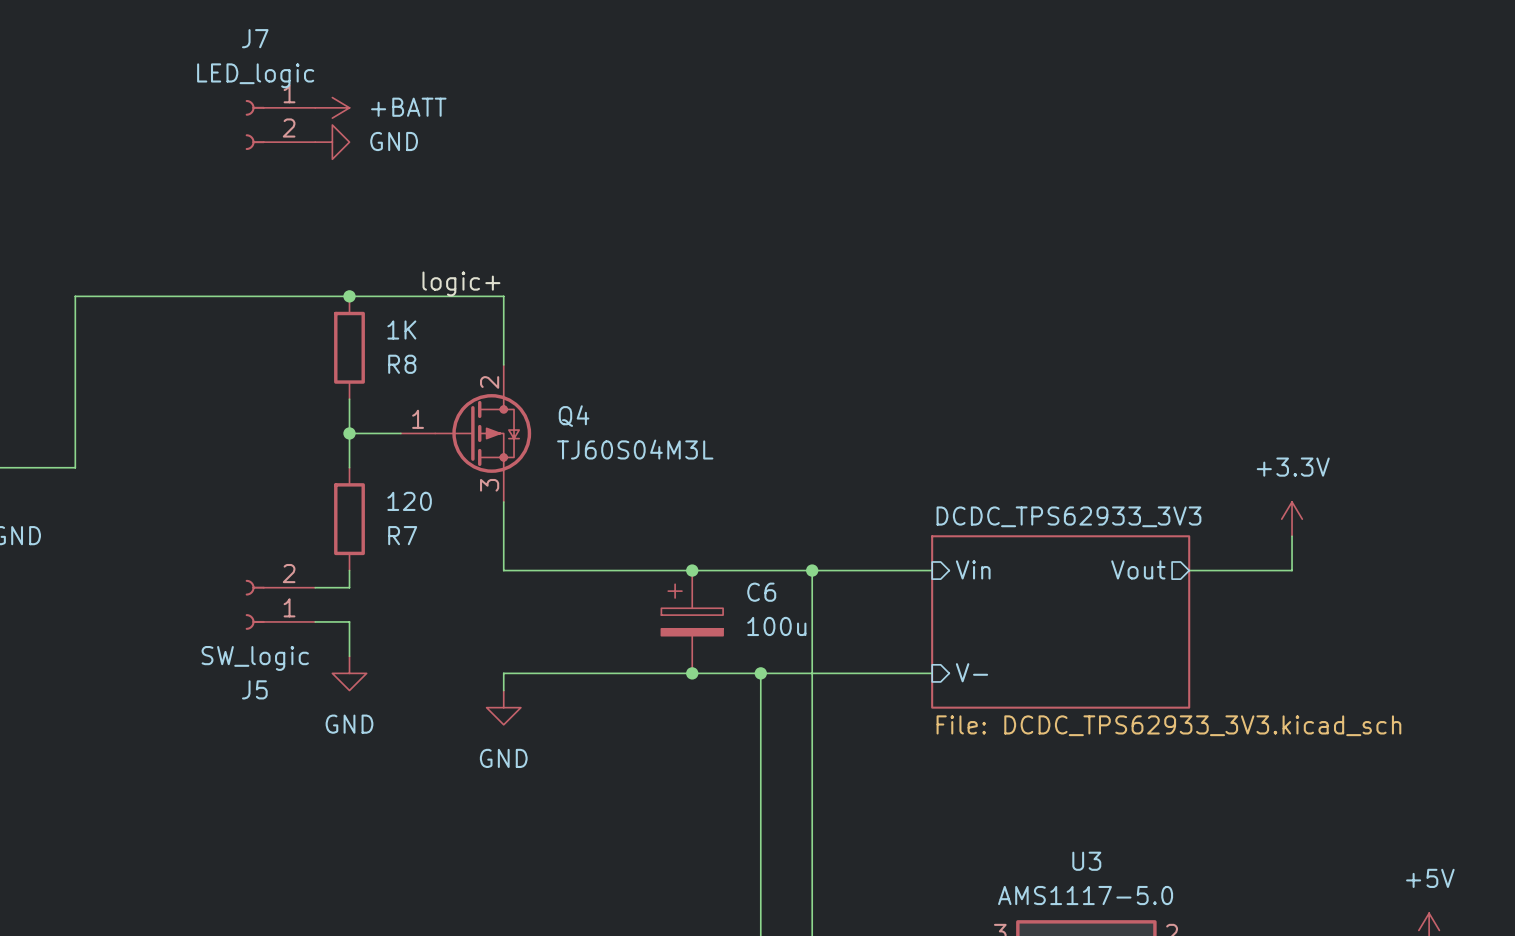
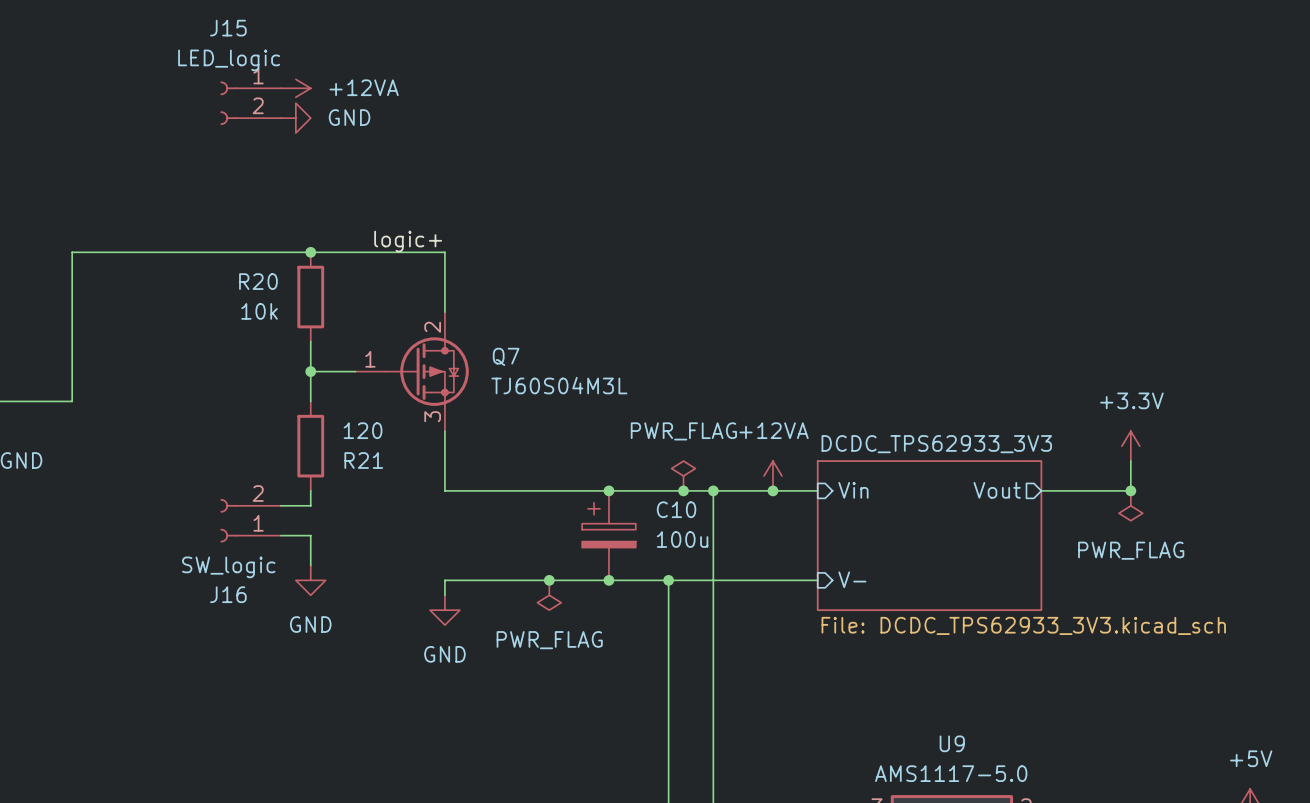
J7 name: J7 (255, 38) -> J15 (228, 28)
power symbol: +BATT (332, 107) -> +12VA (295, 88)
R8 value: 1K (401, 330) -> 10k (259, 311)
R8 name: R8 (402, 364) -> R20 (258, 281)
Q4 name: Q4 (574, 416) -> Q7 (506, 356)
R7 name: R7 (402, 535) -> R21 (363, 460)
power symbol: none -> PWR_FLAG (683, 475)
power symbol: none -> +12VA (772, 475)
junction: none -> (683, 490)
junction: none -> (772, 490)
junction: none -> (1130, 490)
power symbol: none -> PWR_FLAG (1130, 505)
C6 name: C6 (761, 592) -> C10 (676, 509)
junction: none -> (549, 580)
J5 name: J5 (254, 689) -> J16 (228, 594)
power symbol: none -> PWR_FLAG (549, 595)
U3 name: U3 (1086, 861) -> U9 (952, 743)

